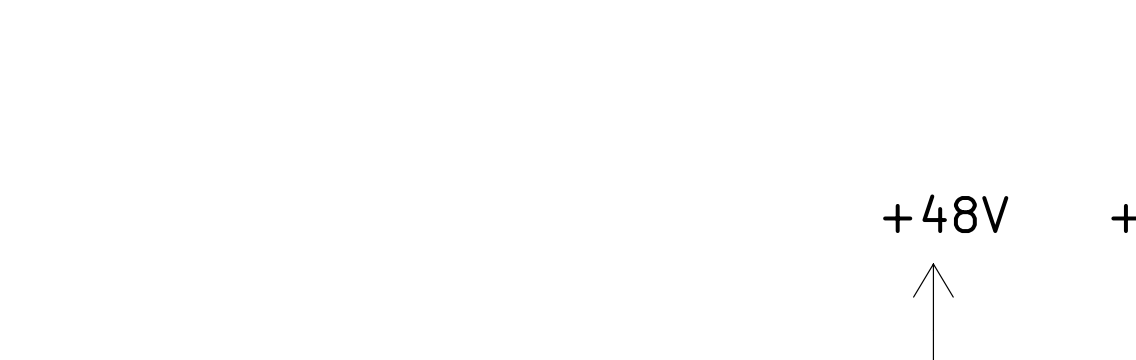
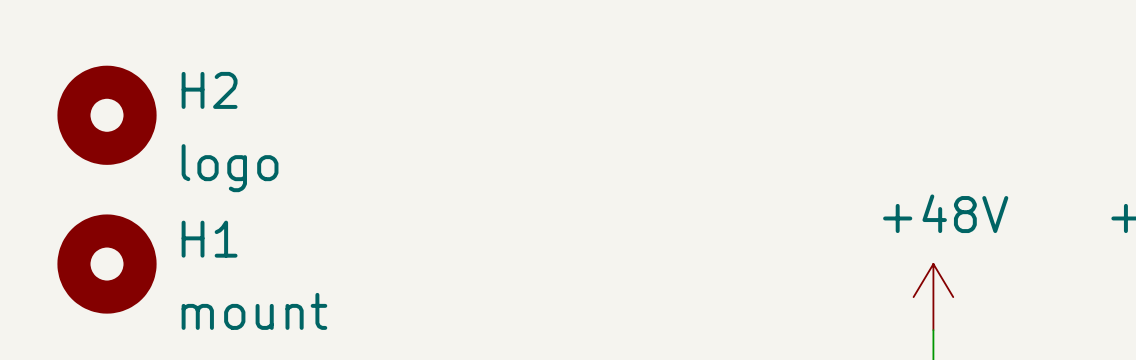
H2: none -> logo (107, 115)
H1: none -> mount (107, 264)

